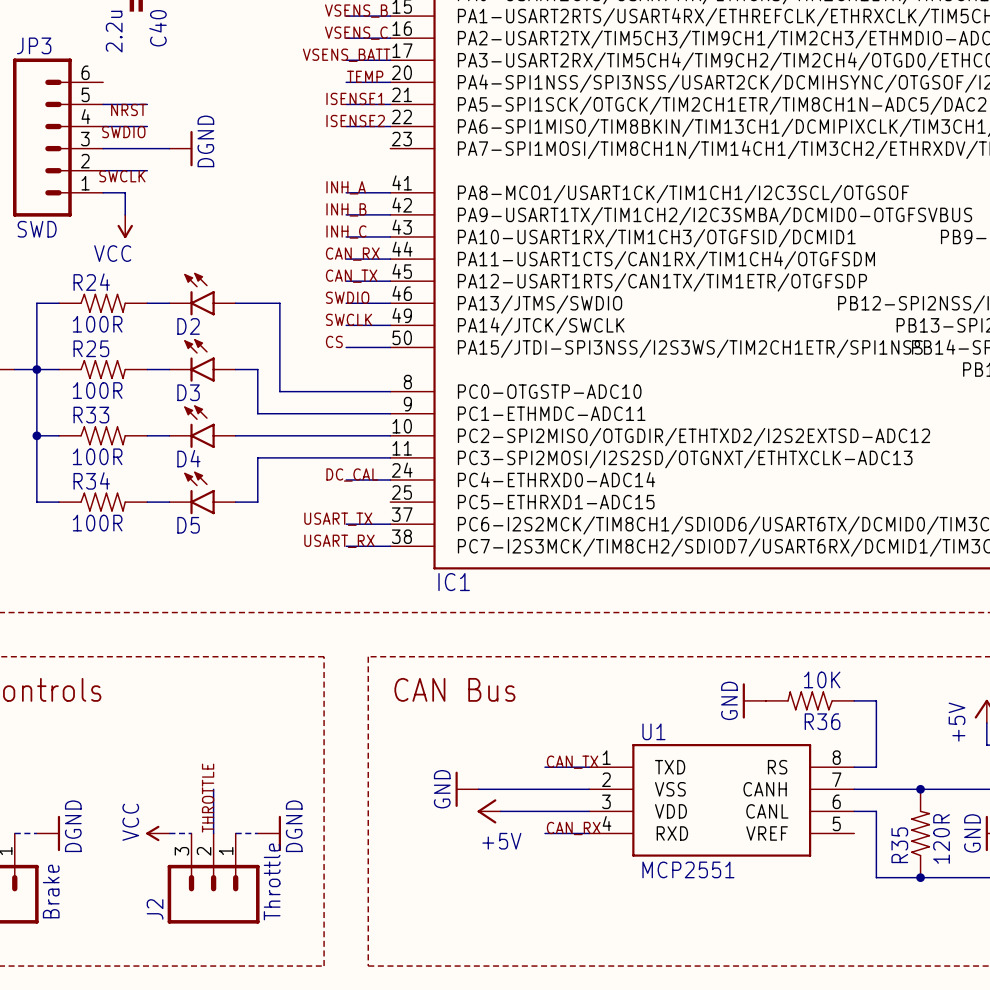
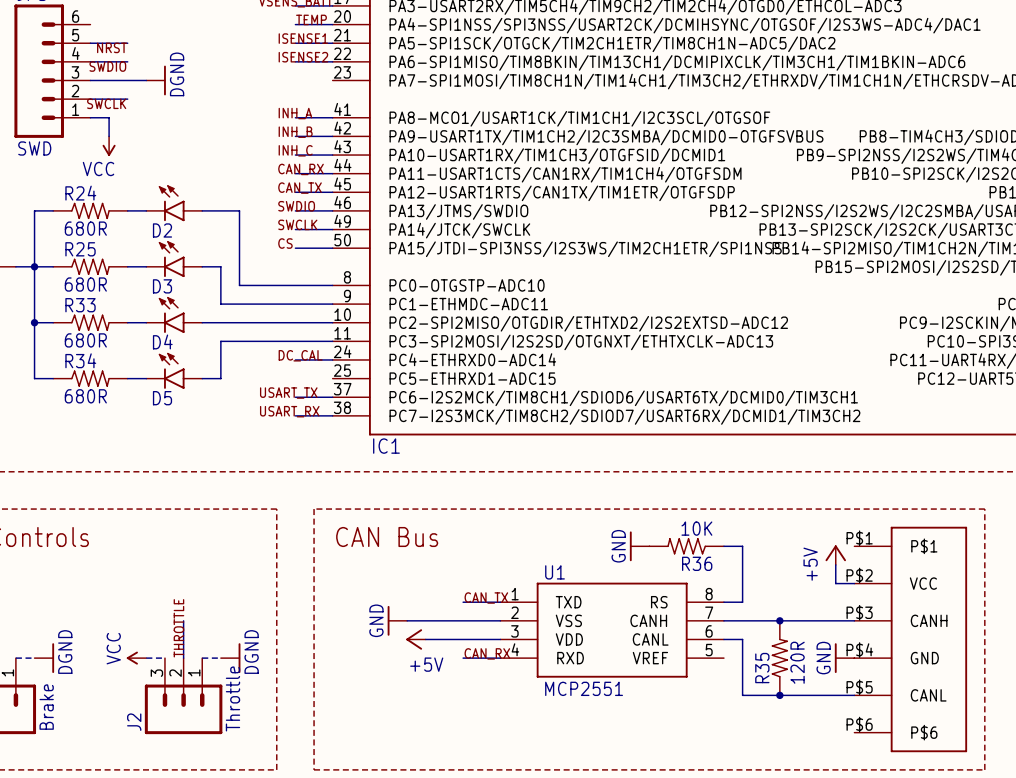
R24 value: 100R (97, 324) -> 680R (85, 228)
R25 value: 100R (97, 390) -> 680R (85, 284)
R33 value: 100R (97, 456) -> 680R (85, 340)
R34 value: 100R (97, 523) -> 680R (85, 396)

